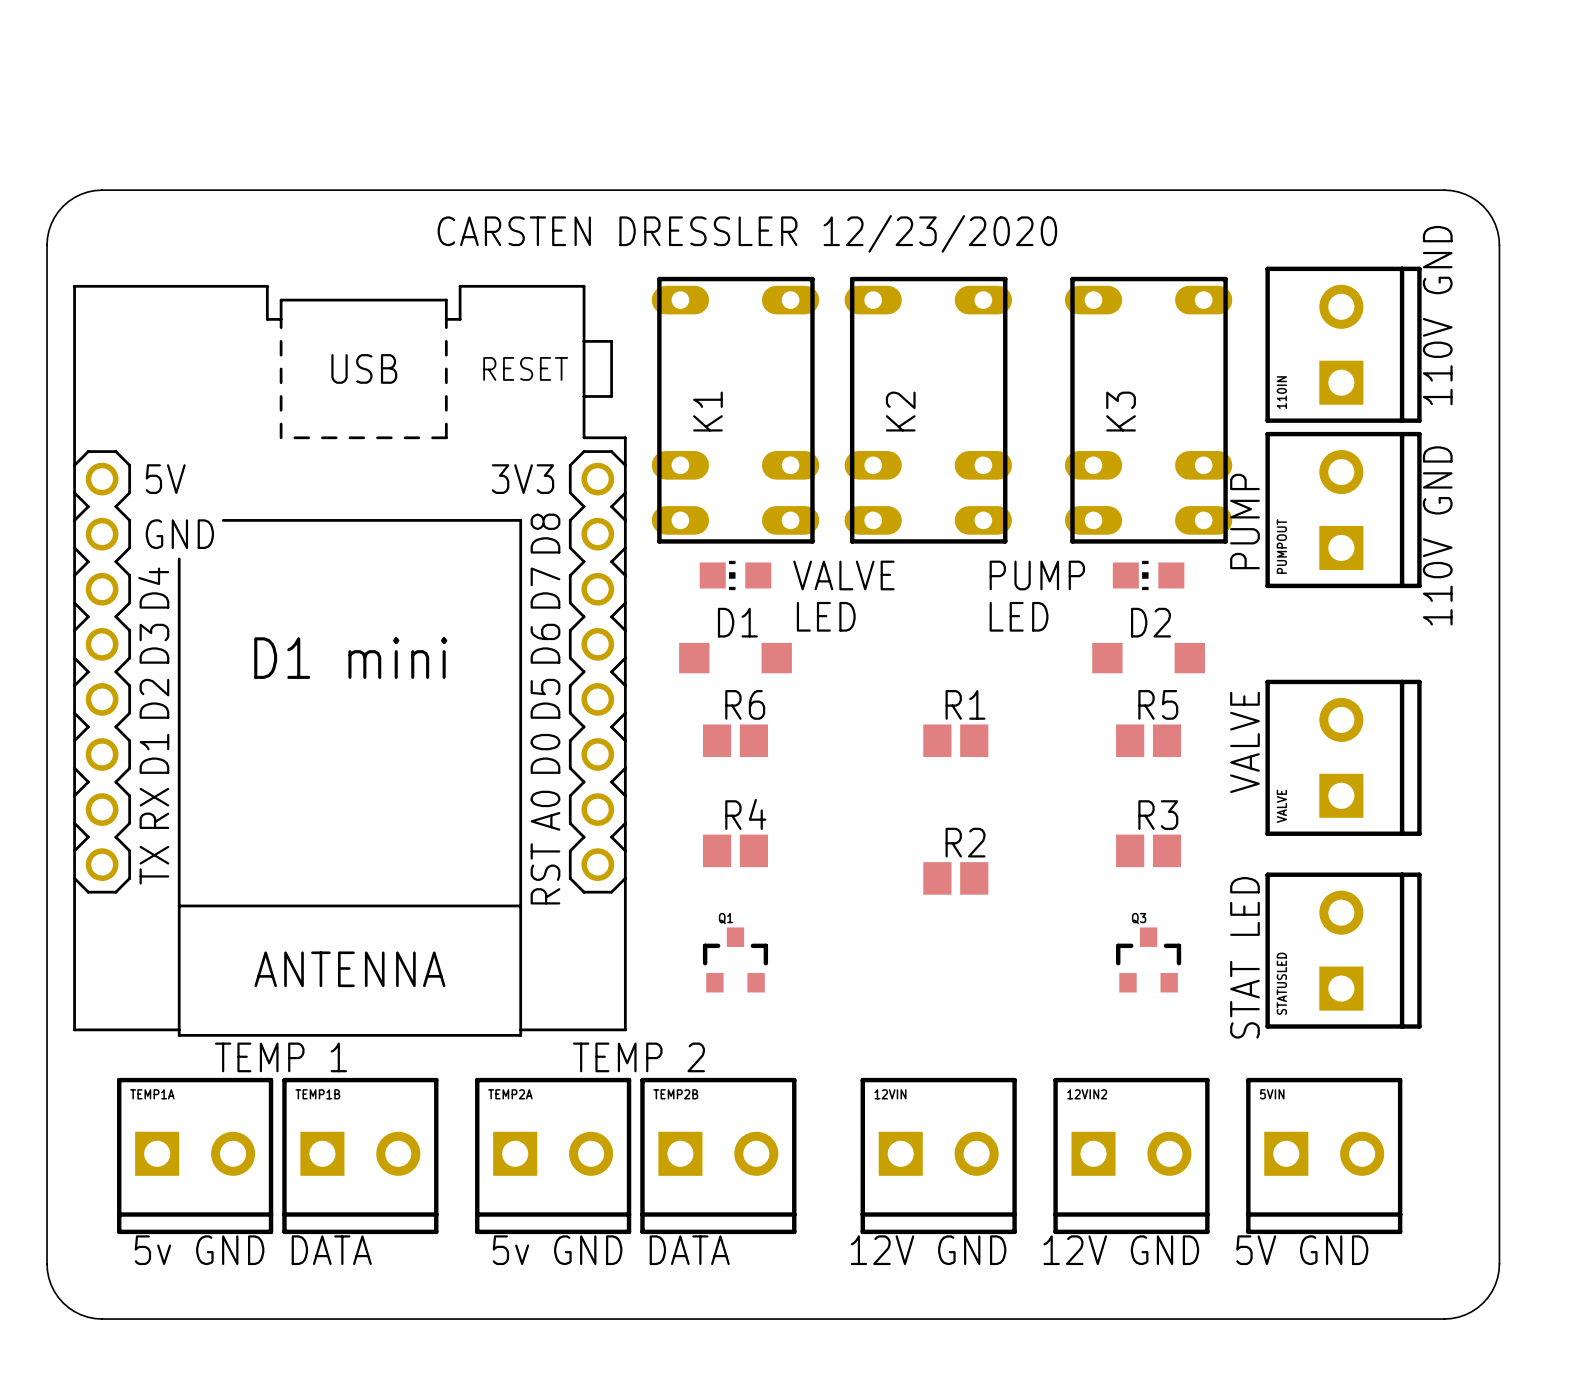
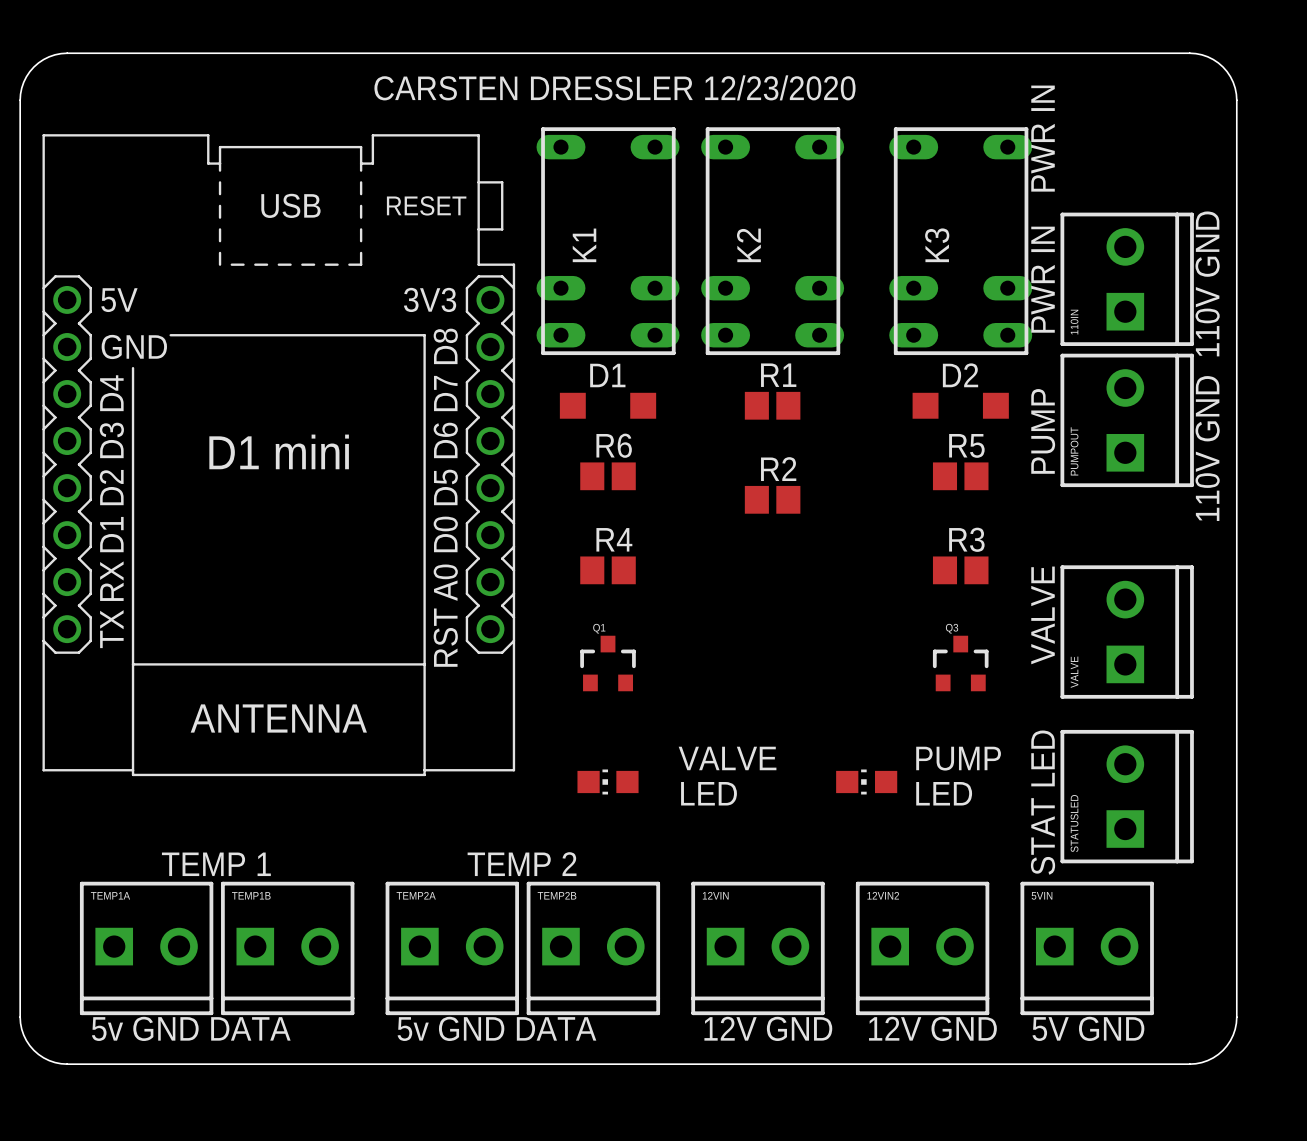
text: none -> PWR IN (1043, 138)
text position: CARSTEN DRESSLER 12/23/2020 (747, 233) -> CARSTEN DRESSLER 12/23/2020 (614, 87)
board edge: (47, 245) (51, 224) (63, 206) (81, 194) (102, 190) (1444, 190) (1458, 192) (1477, 201) (1488, 211) (1495, 224) (1499, 245) (1499, 1263) (1495, 1285) (1483, 1302) (1465, 1314) (1444, 1319) (102, 1319) (87, 1317) (74, 1311) (63, 1302) (54, 1291) (47, 1271) (47, 1208) -> (20, 194) (21, 88) (26, 76) (33, 67) (49, 56) (61, 53) (1189, 53) (1207, 56) (1223, 67) (1233, 82) (1236, 94) (1236, 1017) (1233, 1035) (1227, 1045) (1218, 1054) (1201, 1062) (1189, 1064) (67, 1064) (49, 1060) (33, 1050) (23, 1035) (20, 1017)
text position: 110V GND (1437, 315) -> 110V GND (1207, 283)
text: none -> PWR IN (1043, 279)
K1 position: (735, 410) -> (608, 241)
K2 position: (928, 410) -> (772, 241)
K3 position: (1148, 410) -> (960, 241)
part: (735, 575) -> none
text position: VALVE (843, 575) -> VALVE (727, 758)
text position: PUMP (1037, 575) -> PUMP (958, 758)
part: (1148, 575) -> none
text: LED (826, 616) -> none
text: LED (1019, 616) -> none
D1 position: (735, 658) -> (608, 405)
D2 position: (1148, 658) -> (960, 405)
part position: (349, 660) -> (278, 455)
R6 position: (735, 740) -> (608, 476)
R1 position: (955, 740) -> (772, 405)
R5 position: (1148, 740) -> (960, 476)
R4 position: (735, 850) -> (608, 570)
R3 position: (1148, 850) -> (960, 570)
R2 position: (955, 878) -> (772, 499)
part: none -> (608, 781)
part: none -> (866, 781)
text: none -> LED (709, 793)
text: none -> LED (944, 793)
Q1 position: (735, 959) -> (608, 663)
Q3 position: (1148, 959) -> (960, 663)
text position: TEMP 1 (280, 1057) -> TEMP 1 (216, 864)
text position: TEMP 2 (638, 1057) -> TEMP 2 (522, 864)
TEMP1A position: (195, 1155) -> (146, 948)
TEMP1B position: (360, 1155) -> (287, 948)
TEMP2A position: (553, 1155) -> (452, 948)
TEMP2B position: (718, 1155) -> (593, 948)
12VIN position: (938, 1155) -> (757, 948)
12VIN2 position: (1131, 1155) -> (922, 948)
5VIN position: (1324, 1155) -> (1087, 948)
text position: 5v GND DATA (253, 1250) -> 5v GND DATA (191, 1028)
text position: 5v GND DATA (611, 1250) -> 5v GND DATA (496, 1028)
text position: 12V GND (928, 1250) -> 12V GND (768, 1028)
text position: 12V GND (1121, 1250) -> 12V GND (932, 1028)
text position: 5V GND (1302, 1250) -> 5V GND (1088, 1028)

